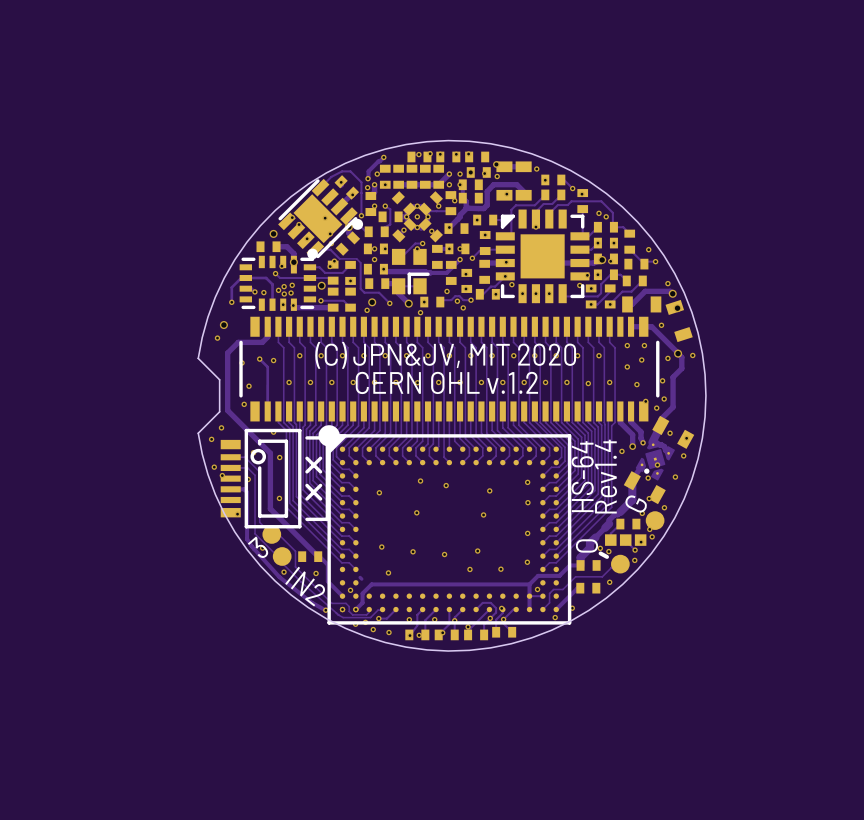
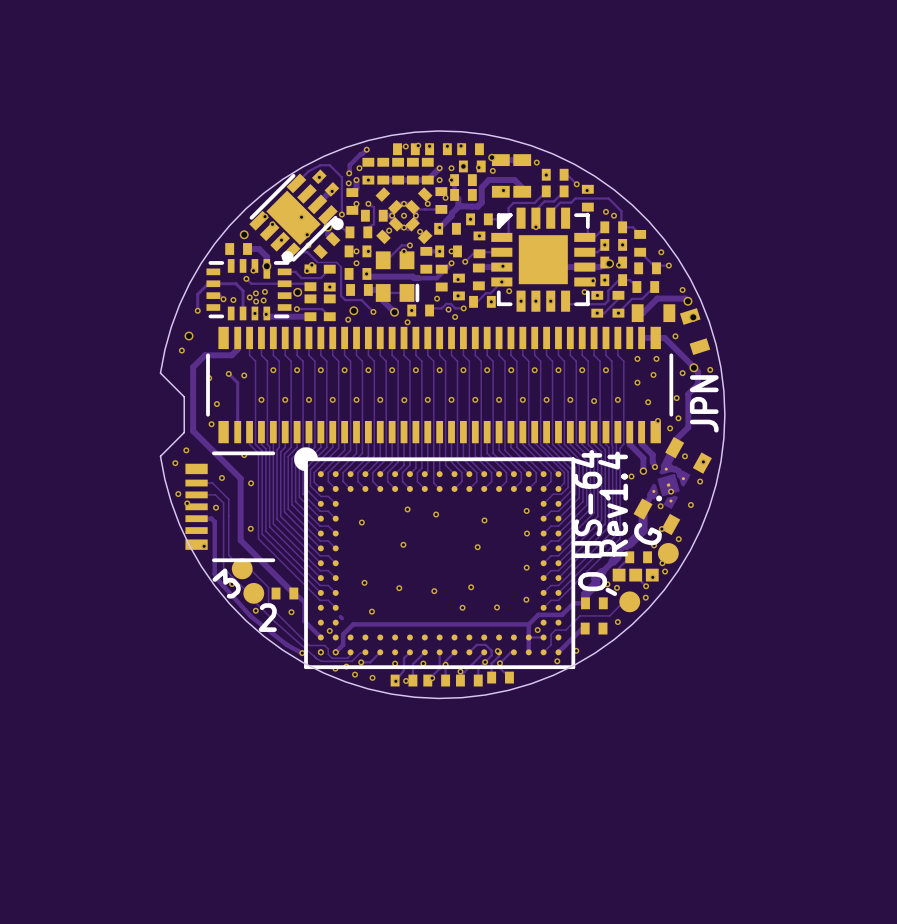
part footprint: [391, 248, 430, 295] -> [375, 251, 420, 303]
text: (C) JPN&JV, MIT 2020 (445, 355) -> none
text: CERN OHL v.1.2 (446, 382) -> none
text: none -> JPN (704, 403)
part footprint: [318, 425, 572, 625] -> [294, 447, 576, 670]
part footprint: [220, 428, 330, 529] -> [185, 451, 276, 563]
text: IN2 (305, 586) -> 2 (267, 617)

